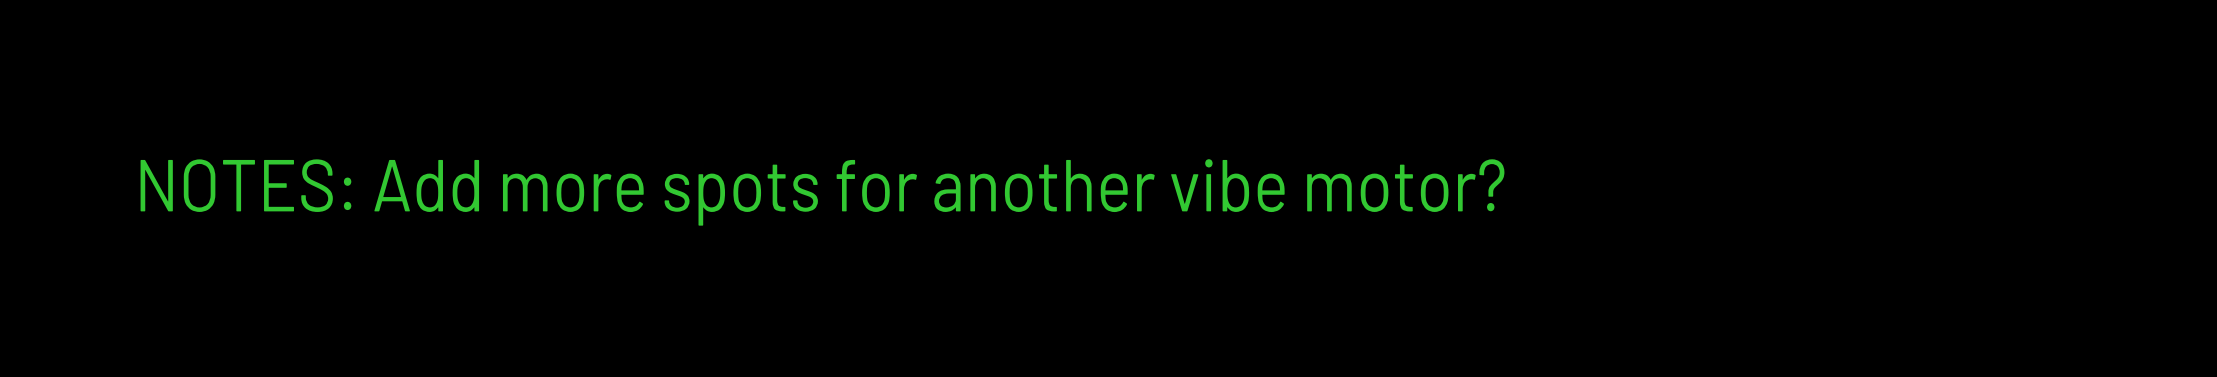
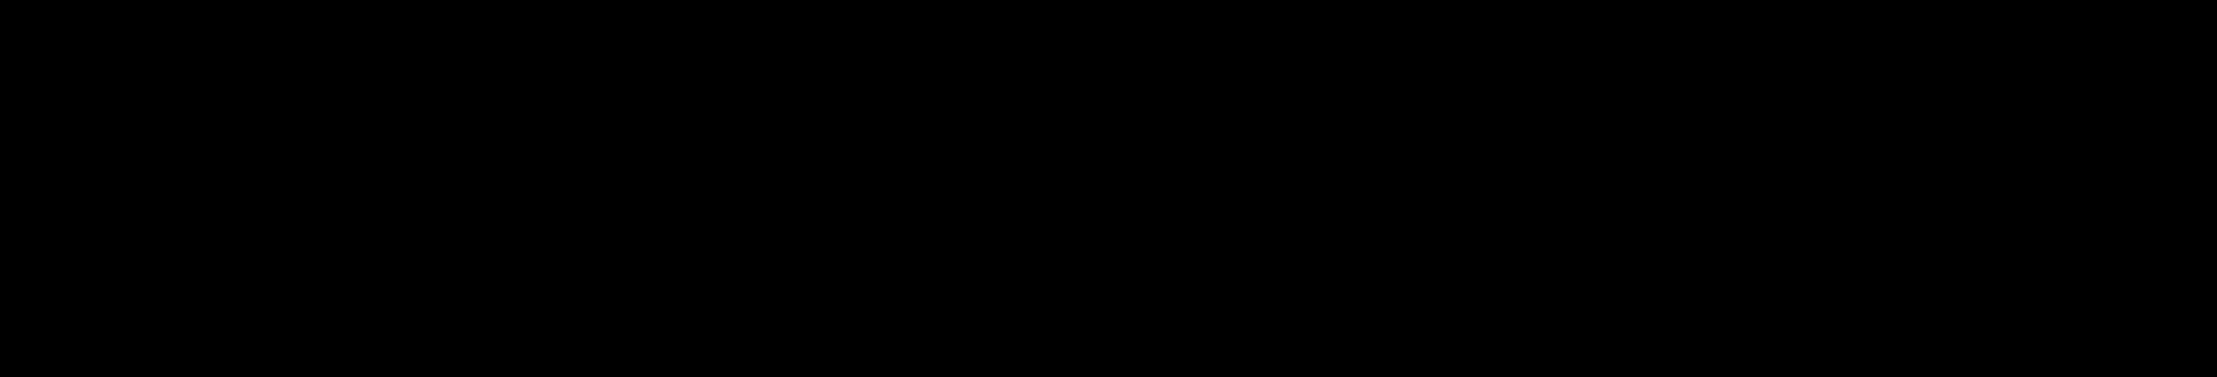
text: NOTES: Add more spots for another vibe motor? (822, 192) -> none

